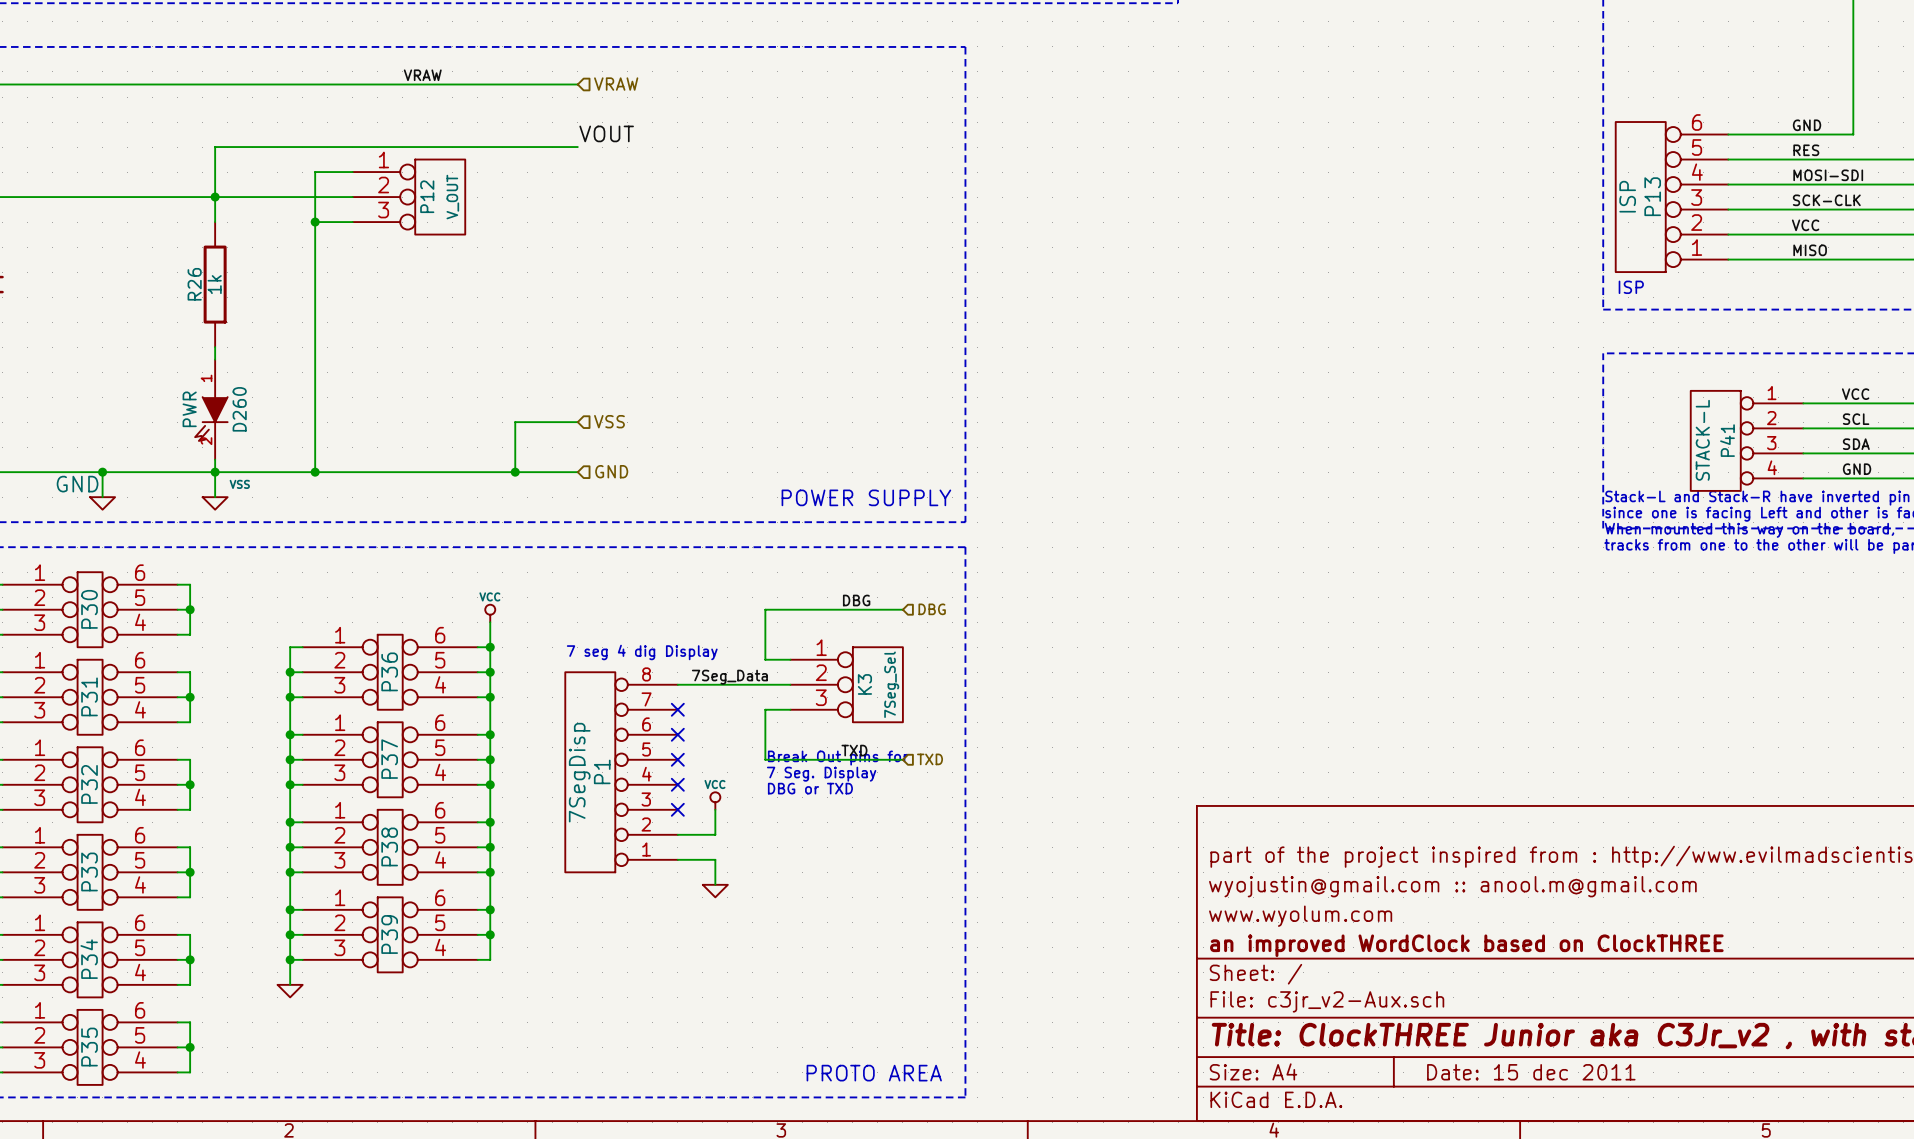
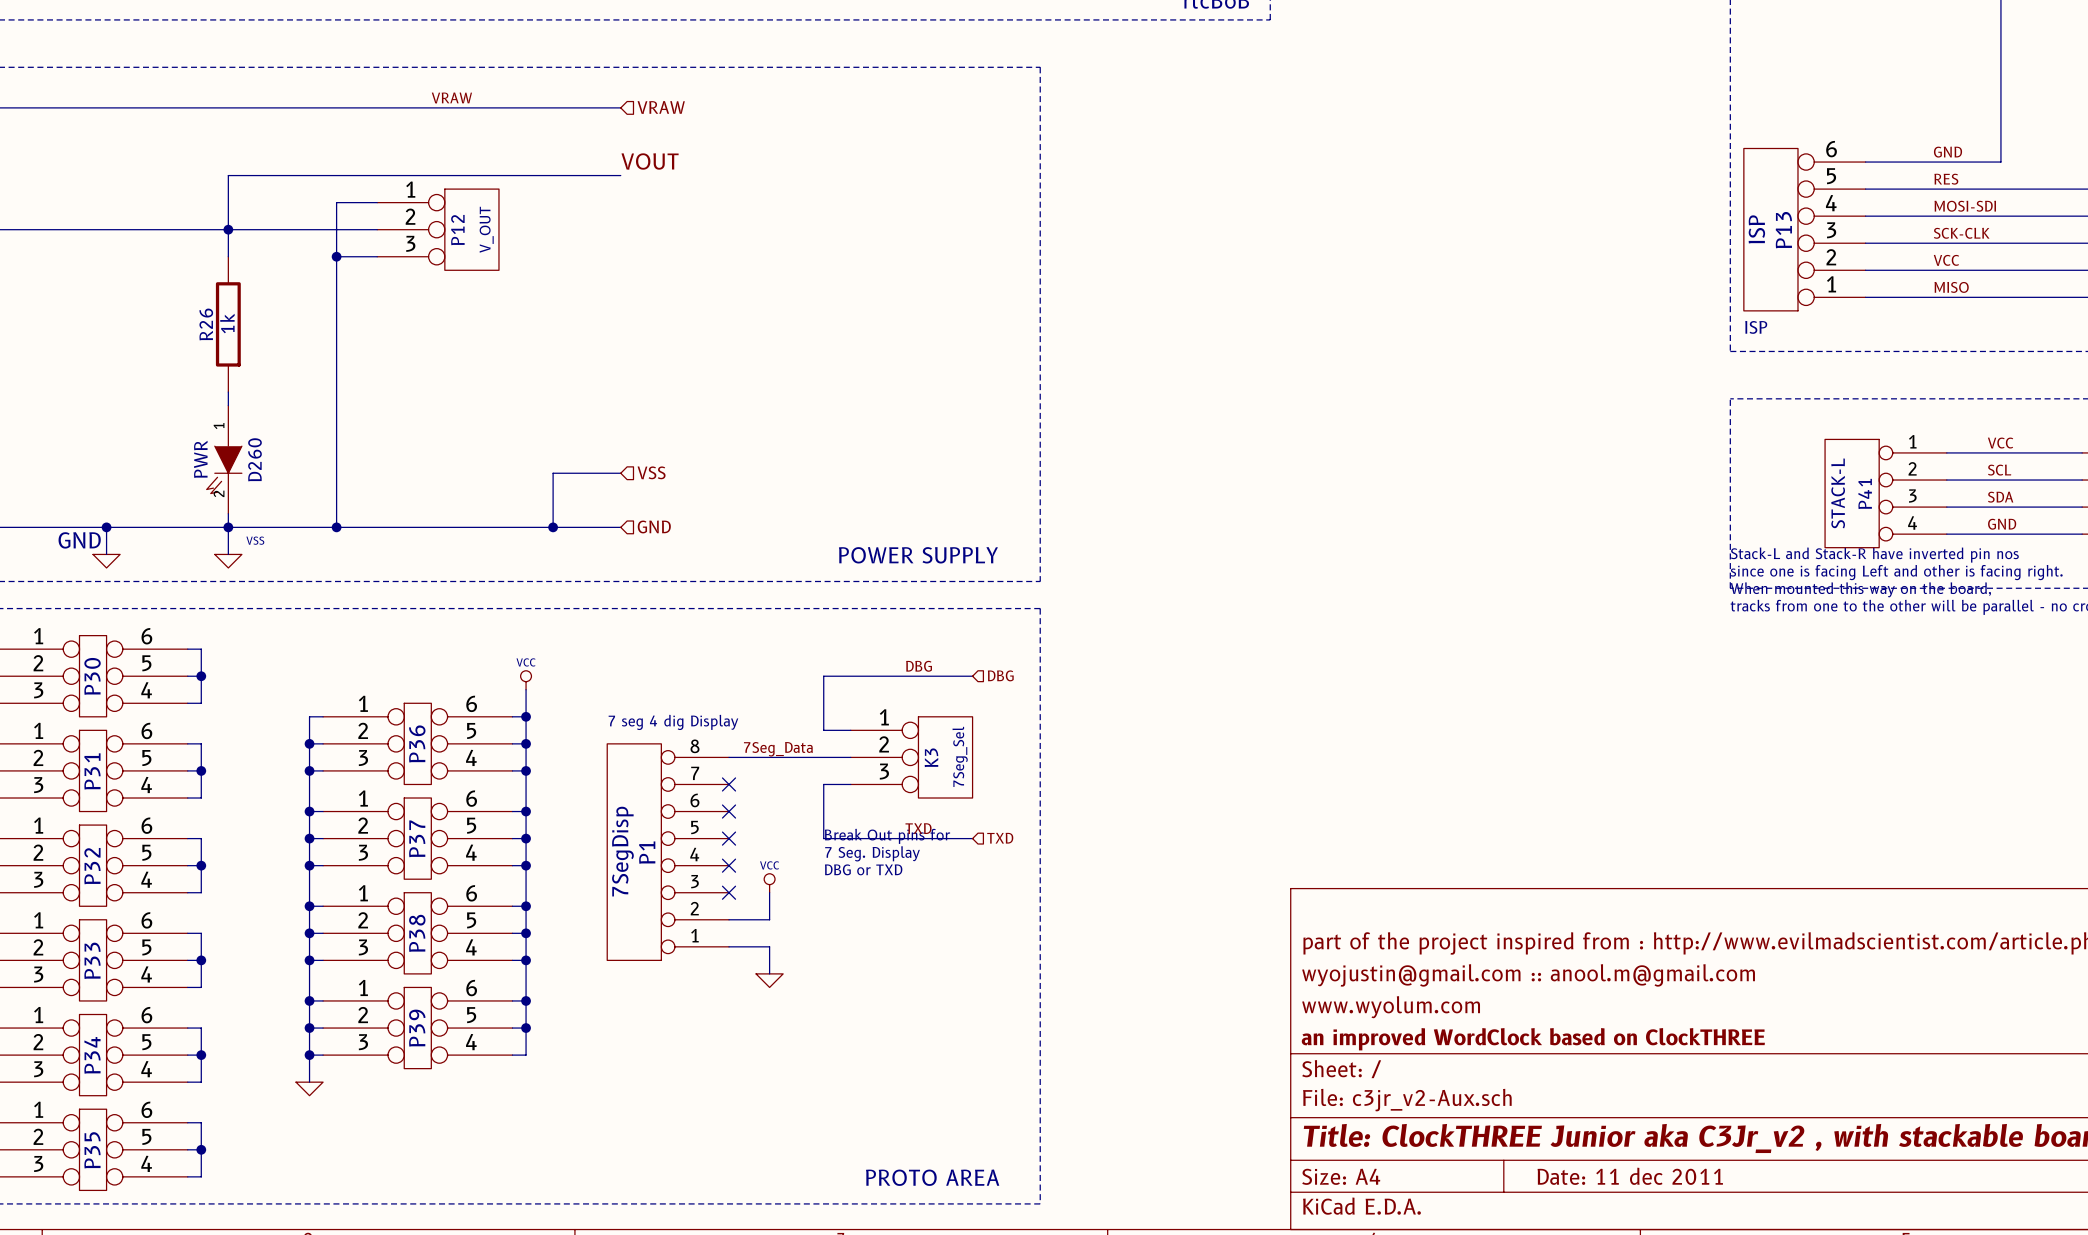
title block: Date: 15 dec 2011 (1531, 1072) -> Date: 11 dec 2011 (1630, 1176)

